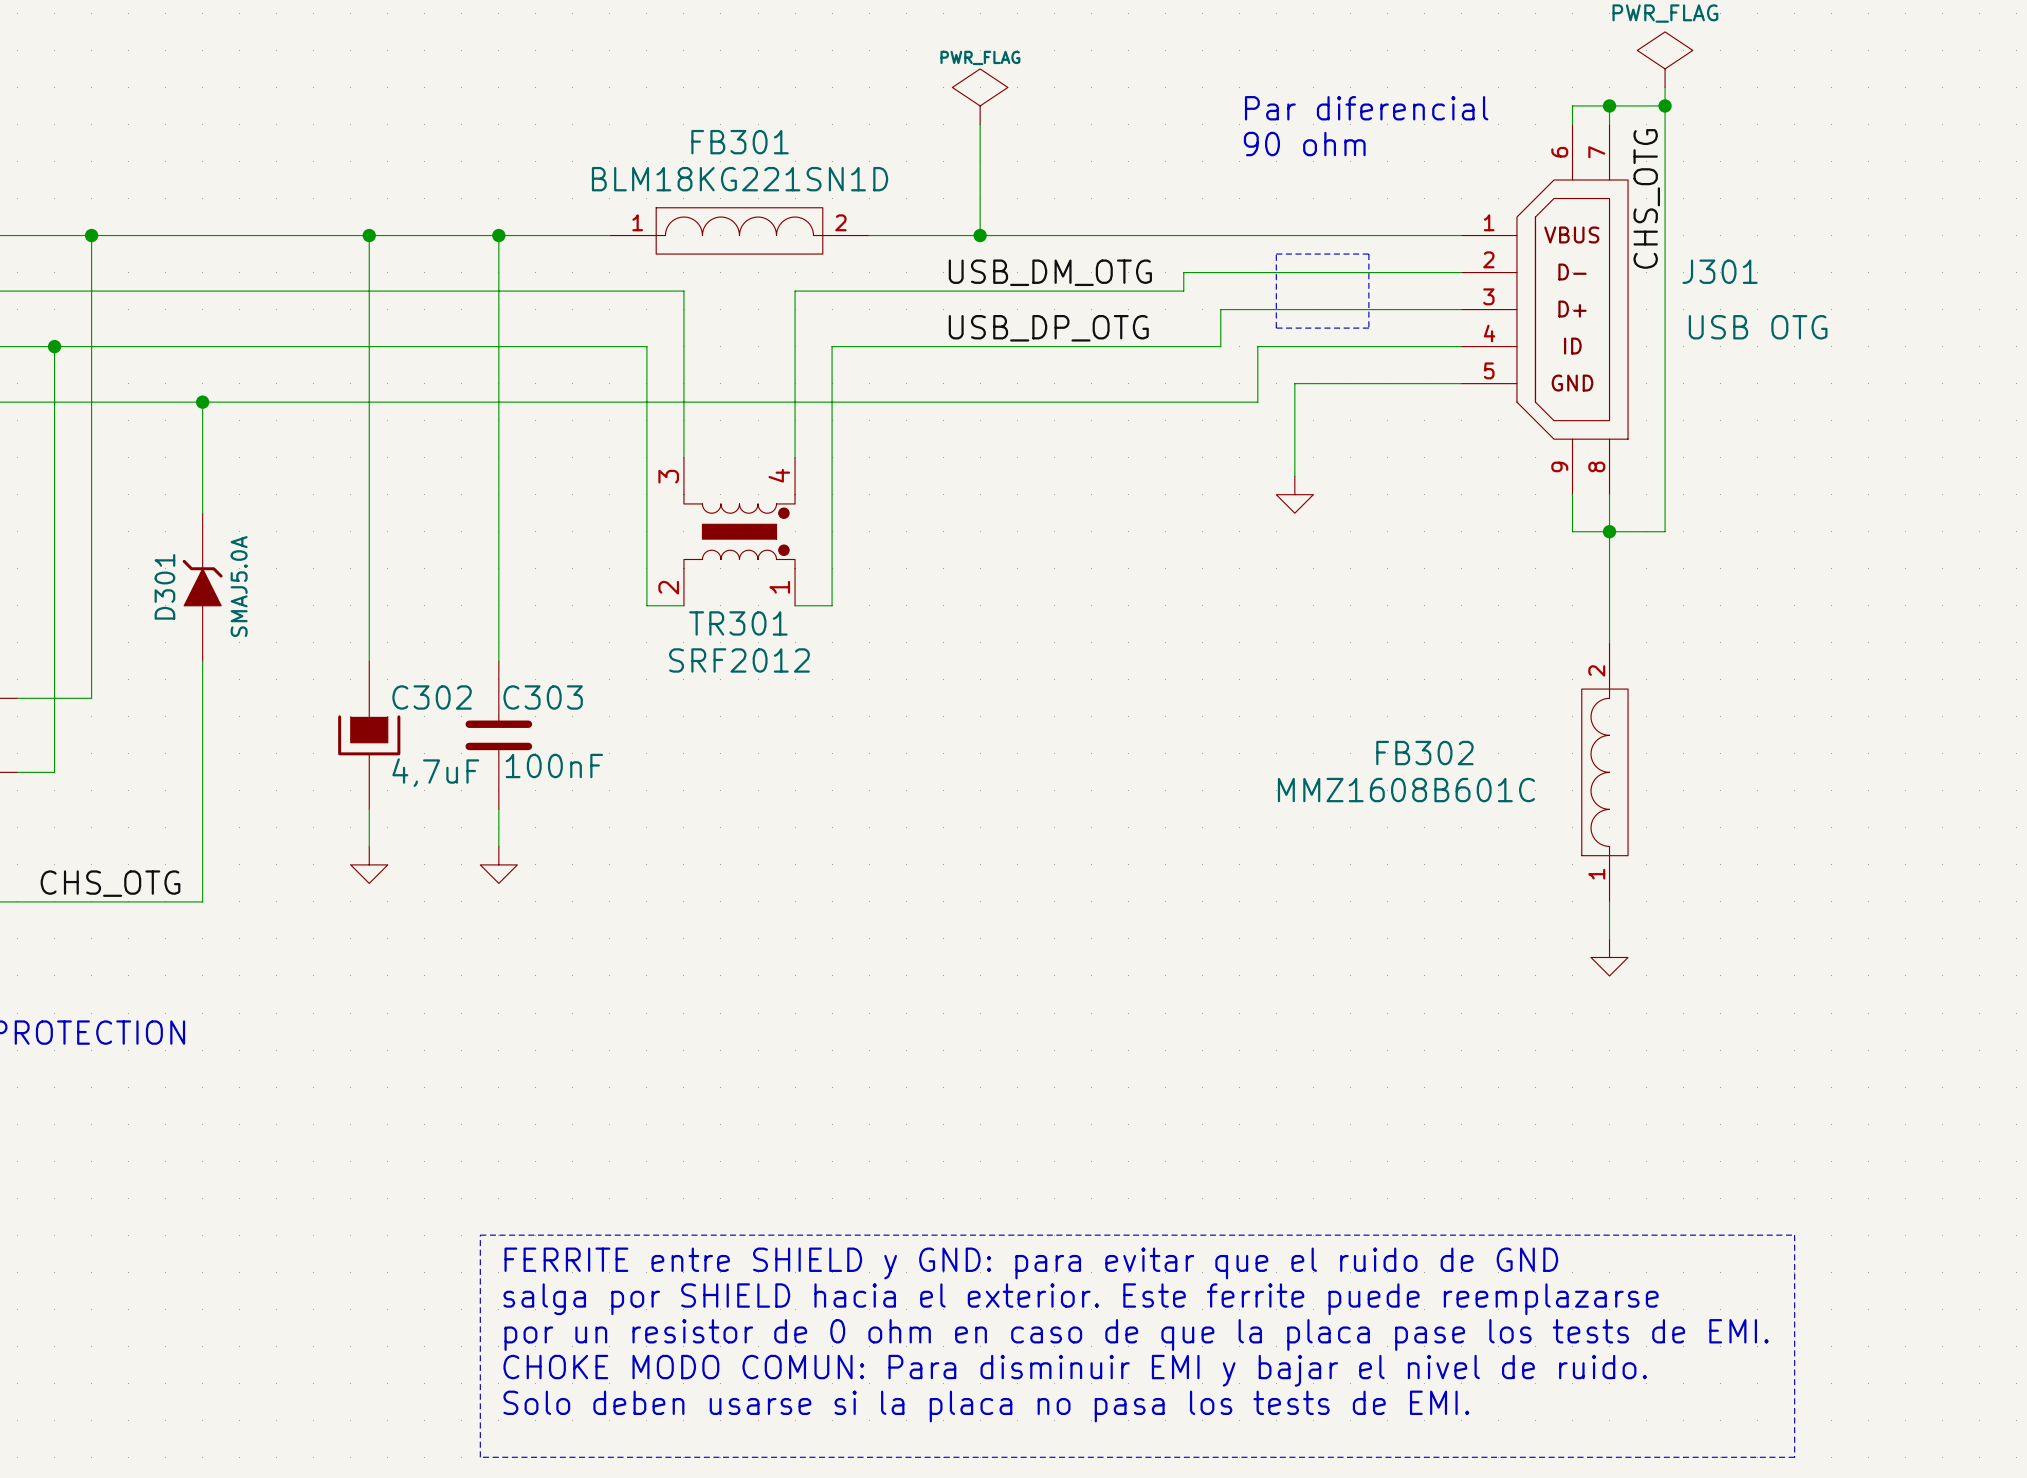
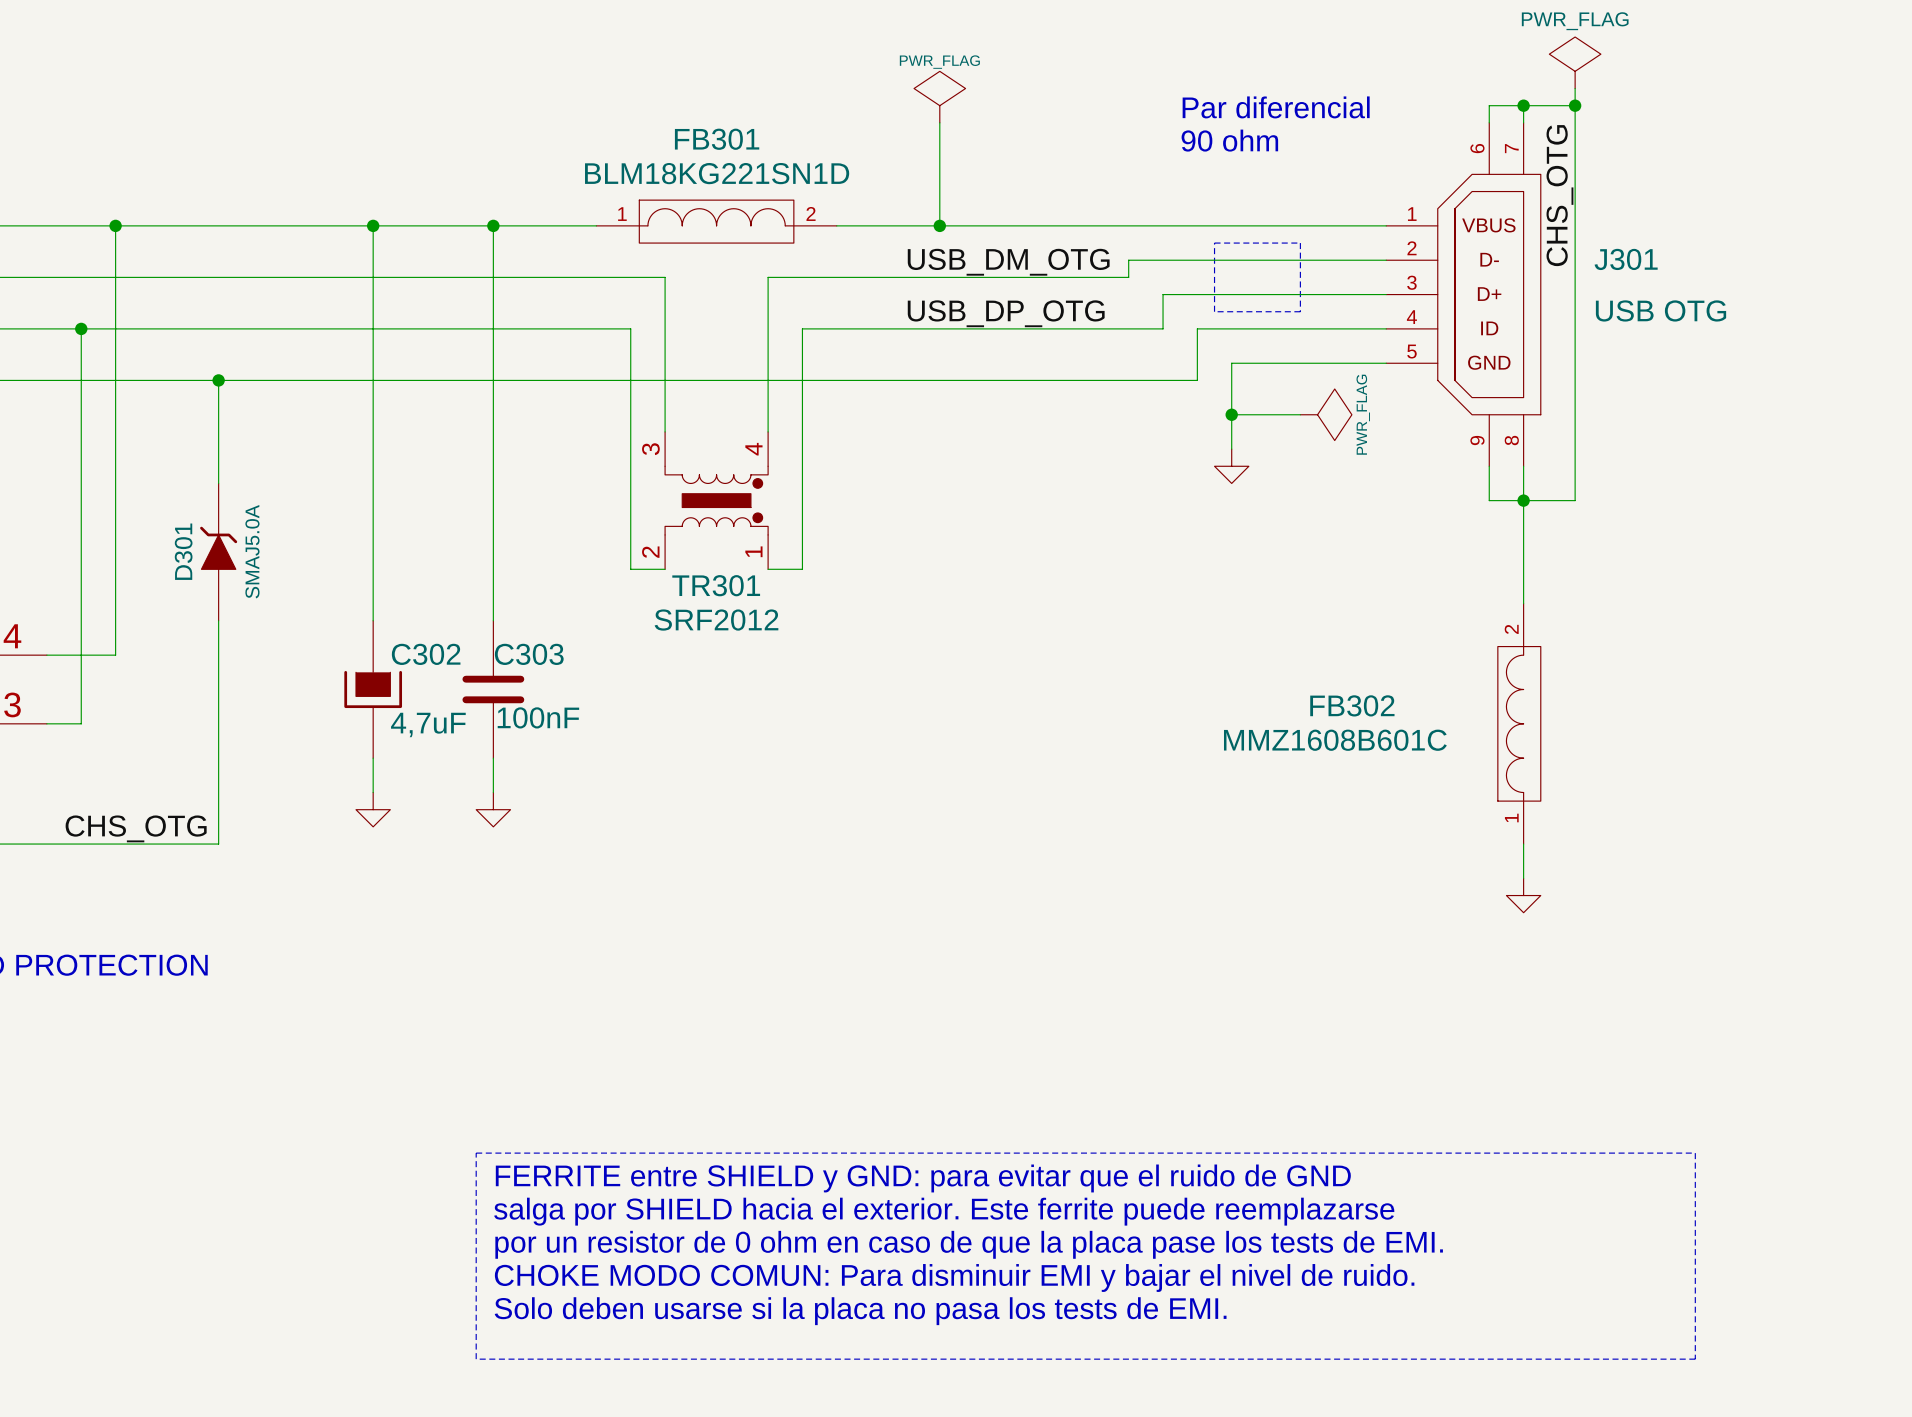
wire: none -> (1231, 414) (1300, 414)
junction: none -> (1231, 414)
power symbol: none -> PWR_FLAG (1326, 414)

